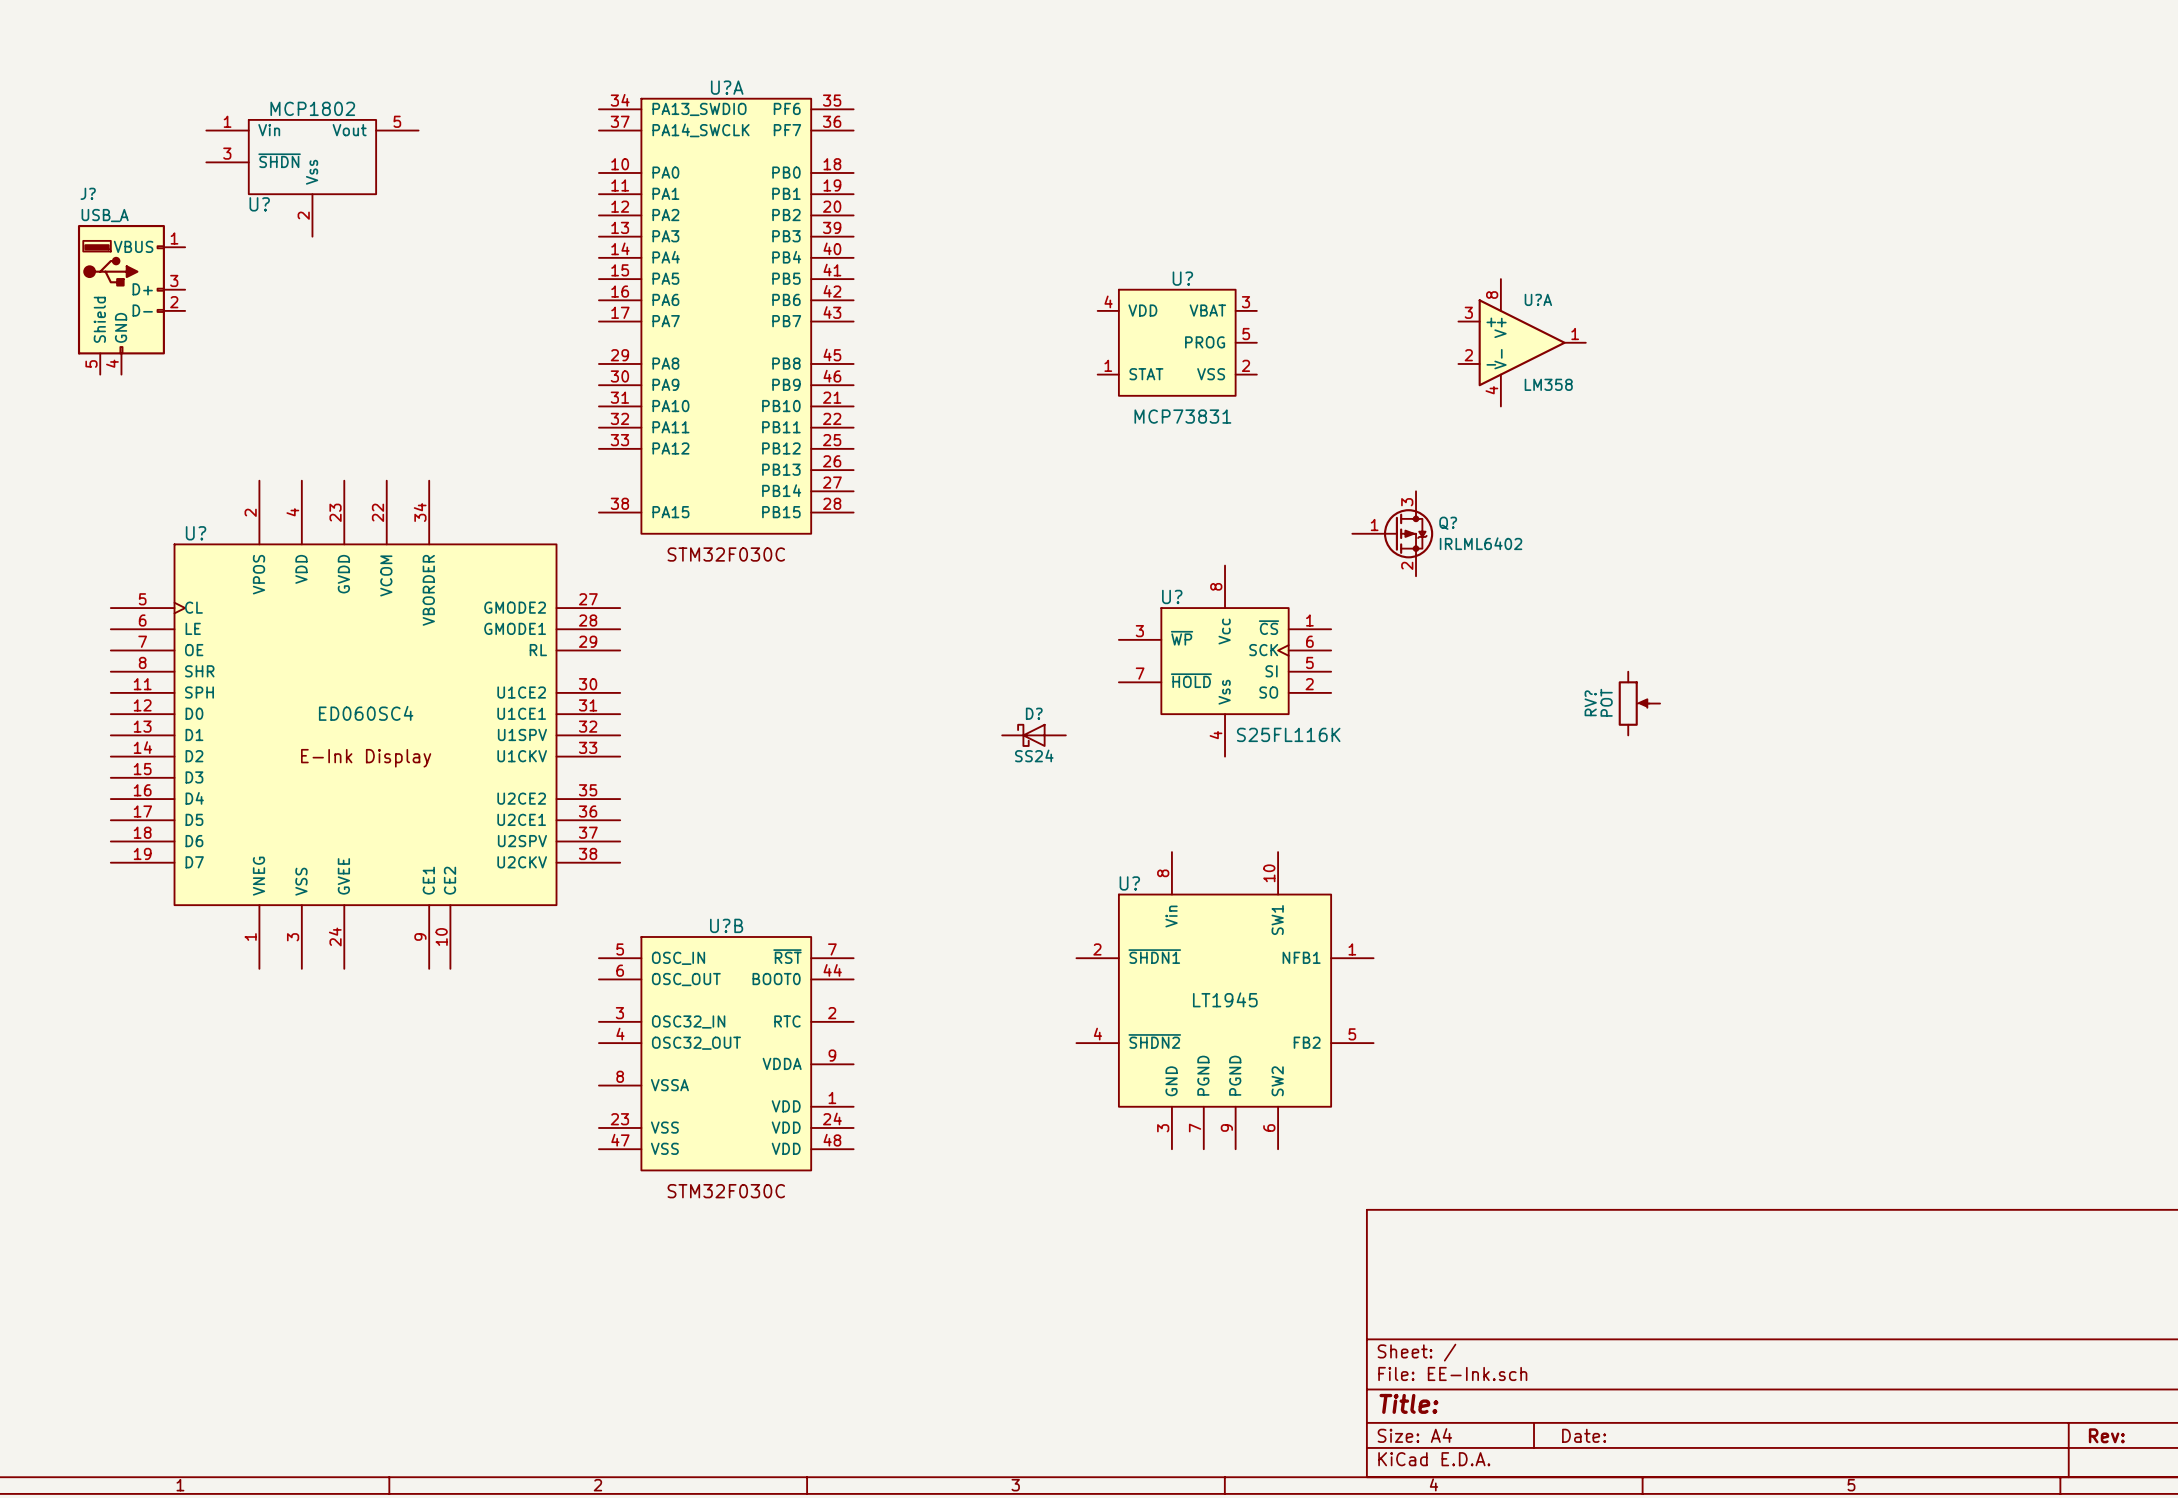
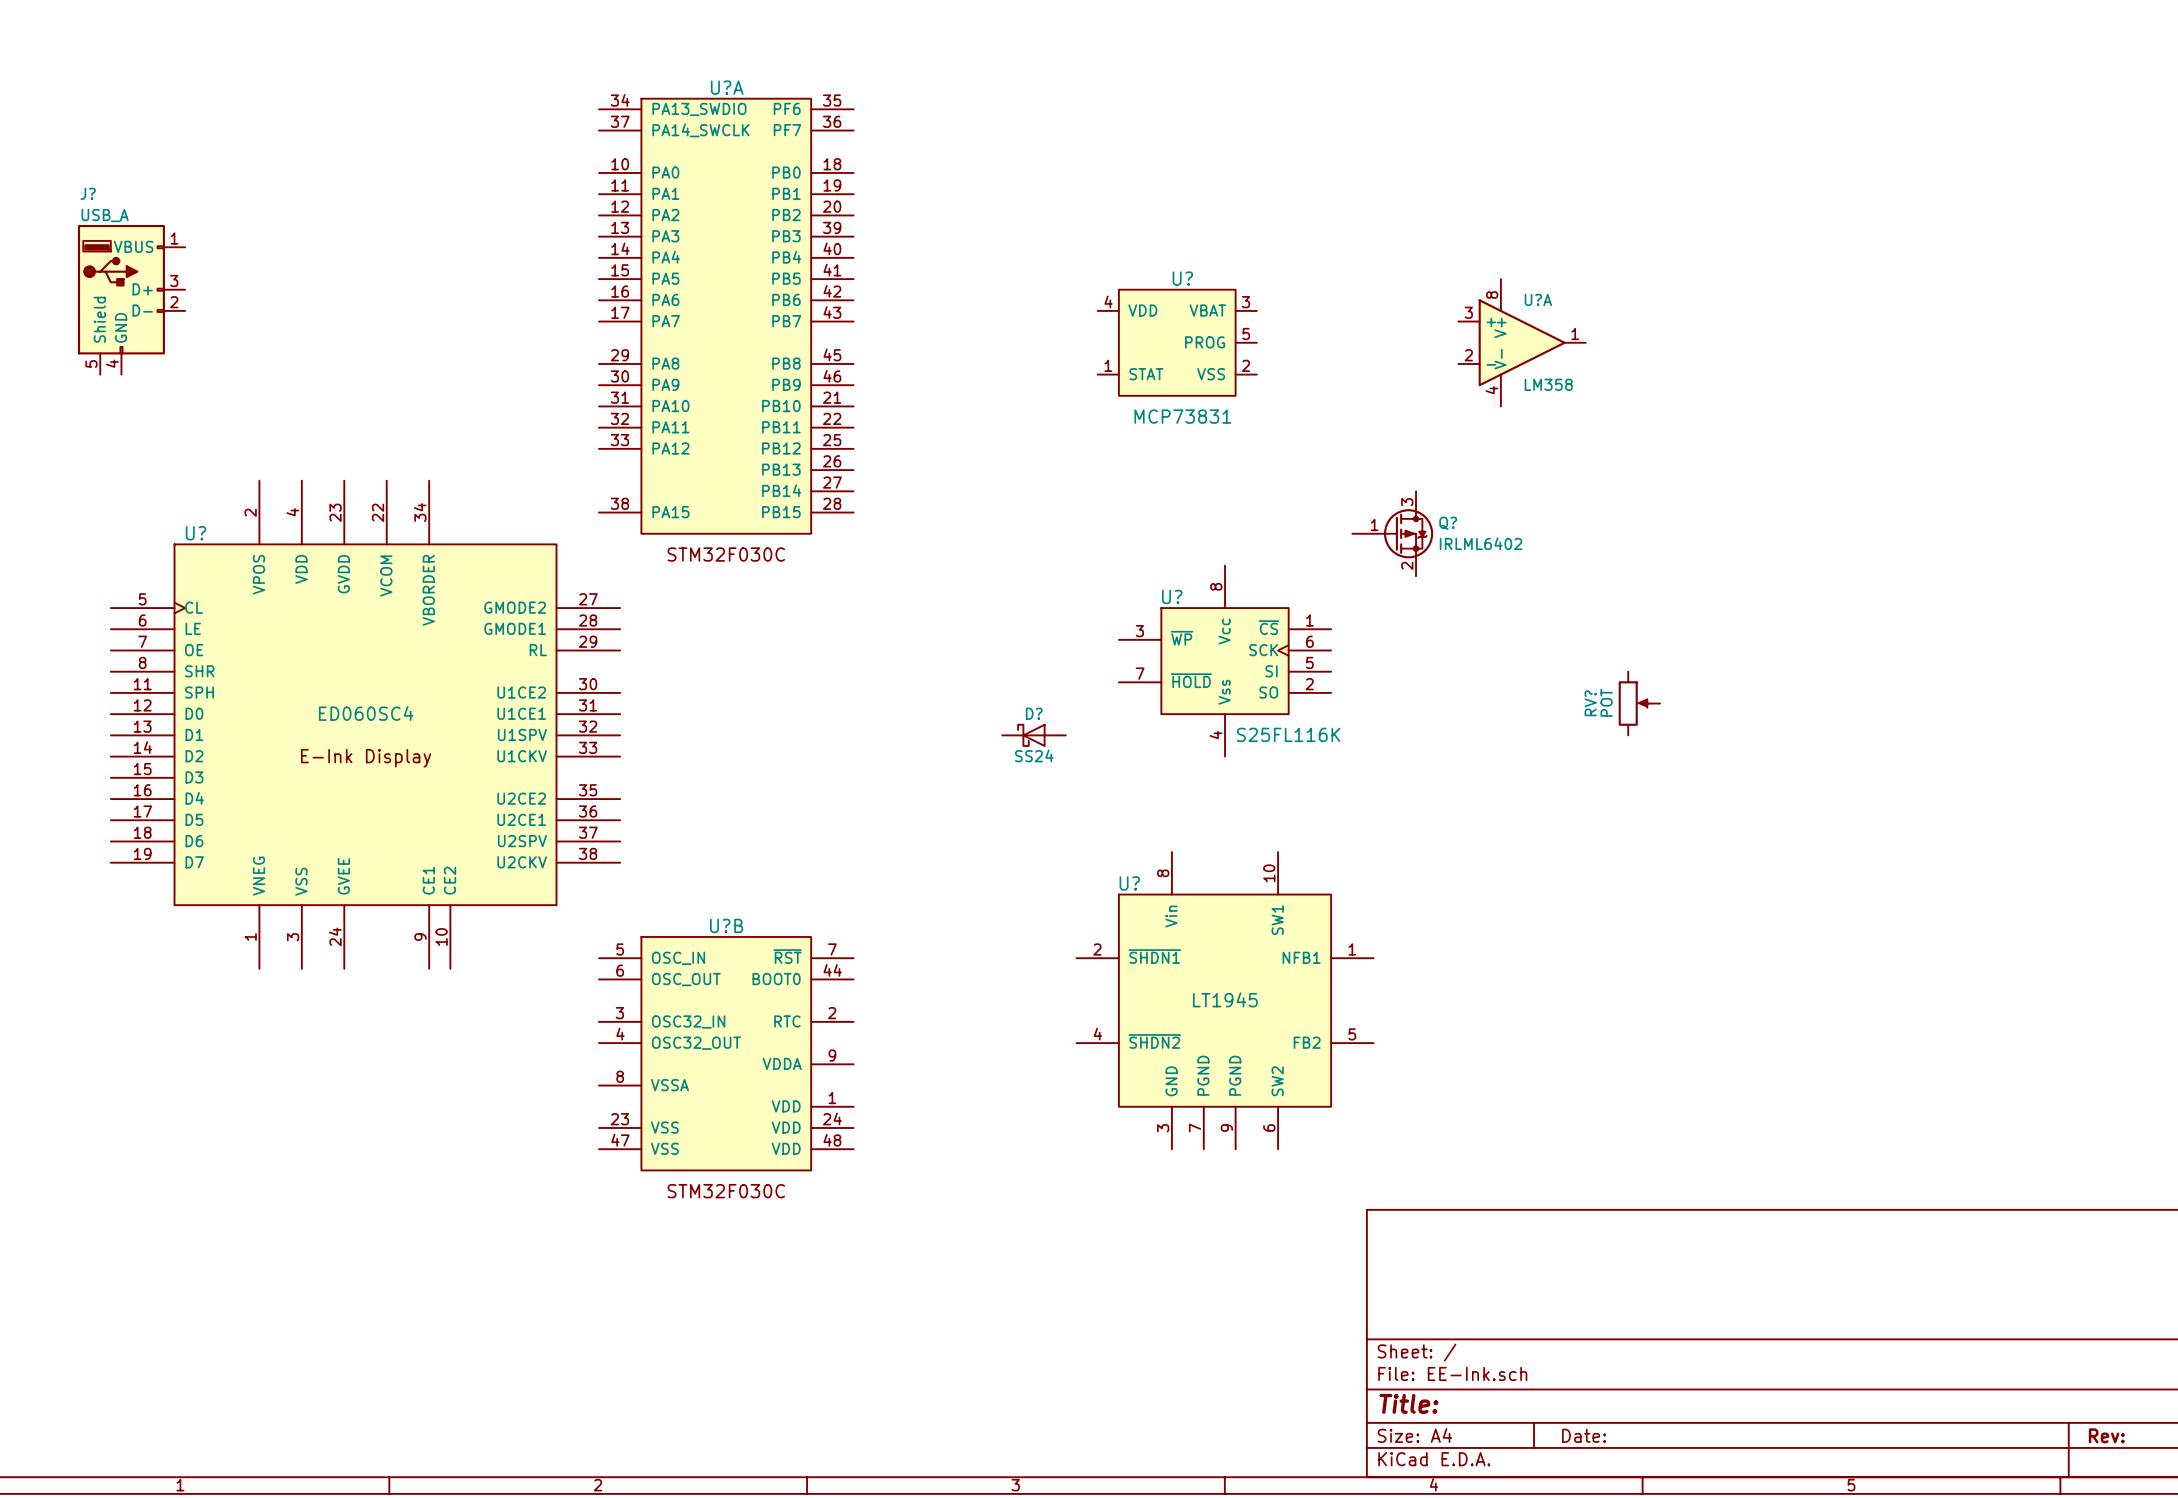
U?: MCP1802 (312, 178) -> none

